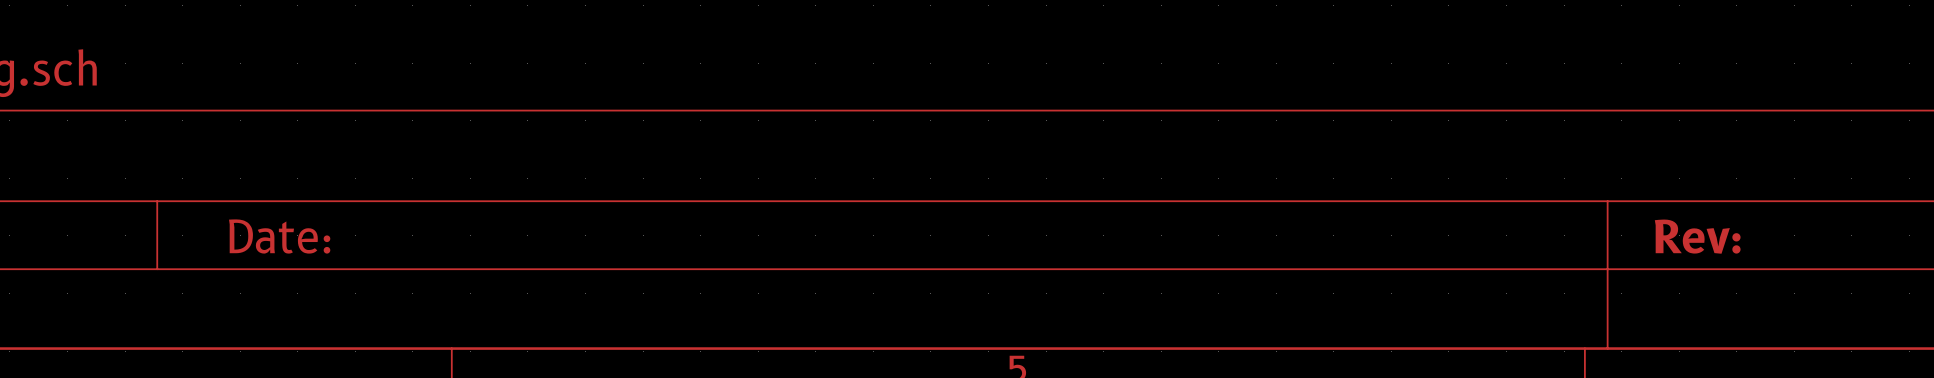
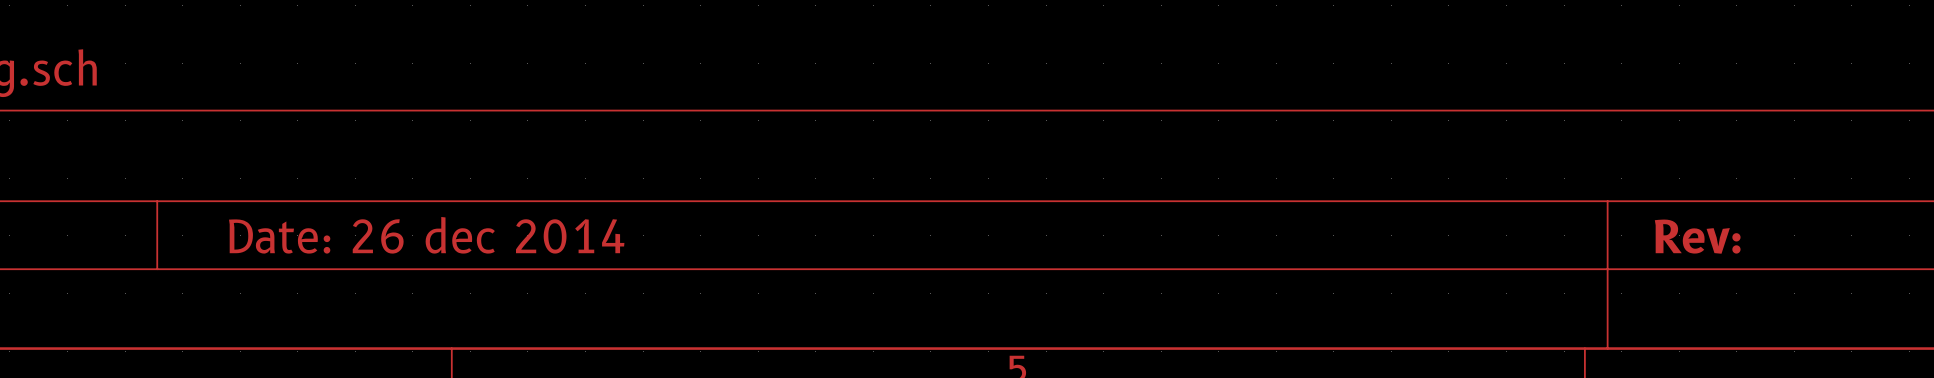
title block: Date: (279, 236) -> Date: 26 dec 2014 (426, 235)

